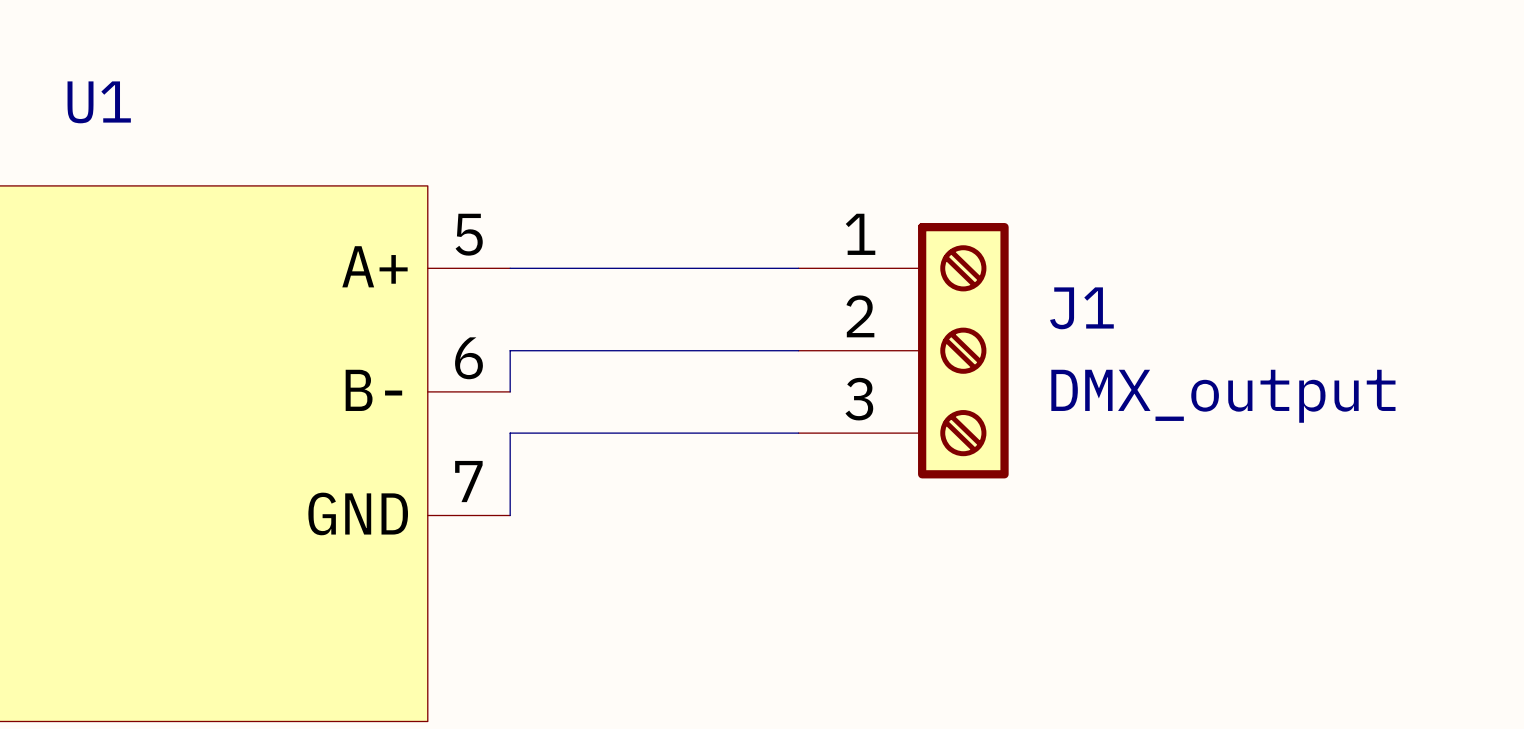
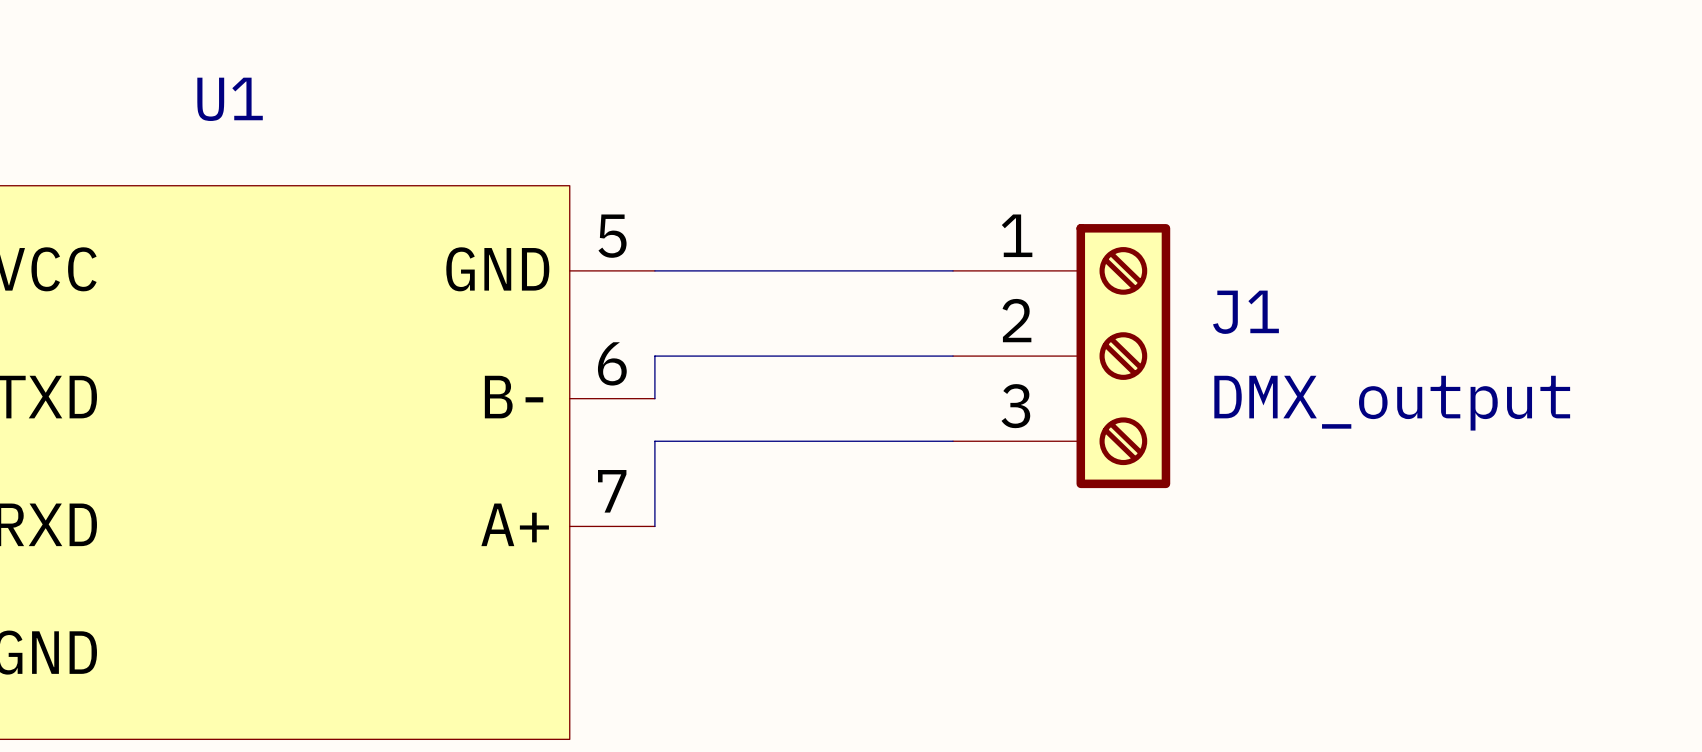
U1 pin name: A+ (374, 266) -> GND (497, 269)
U1 pin name: GND (358, 513) -> A+ (515, 524)

